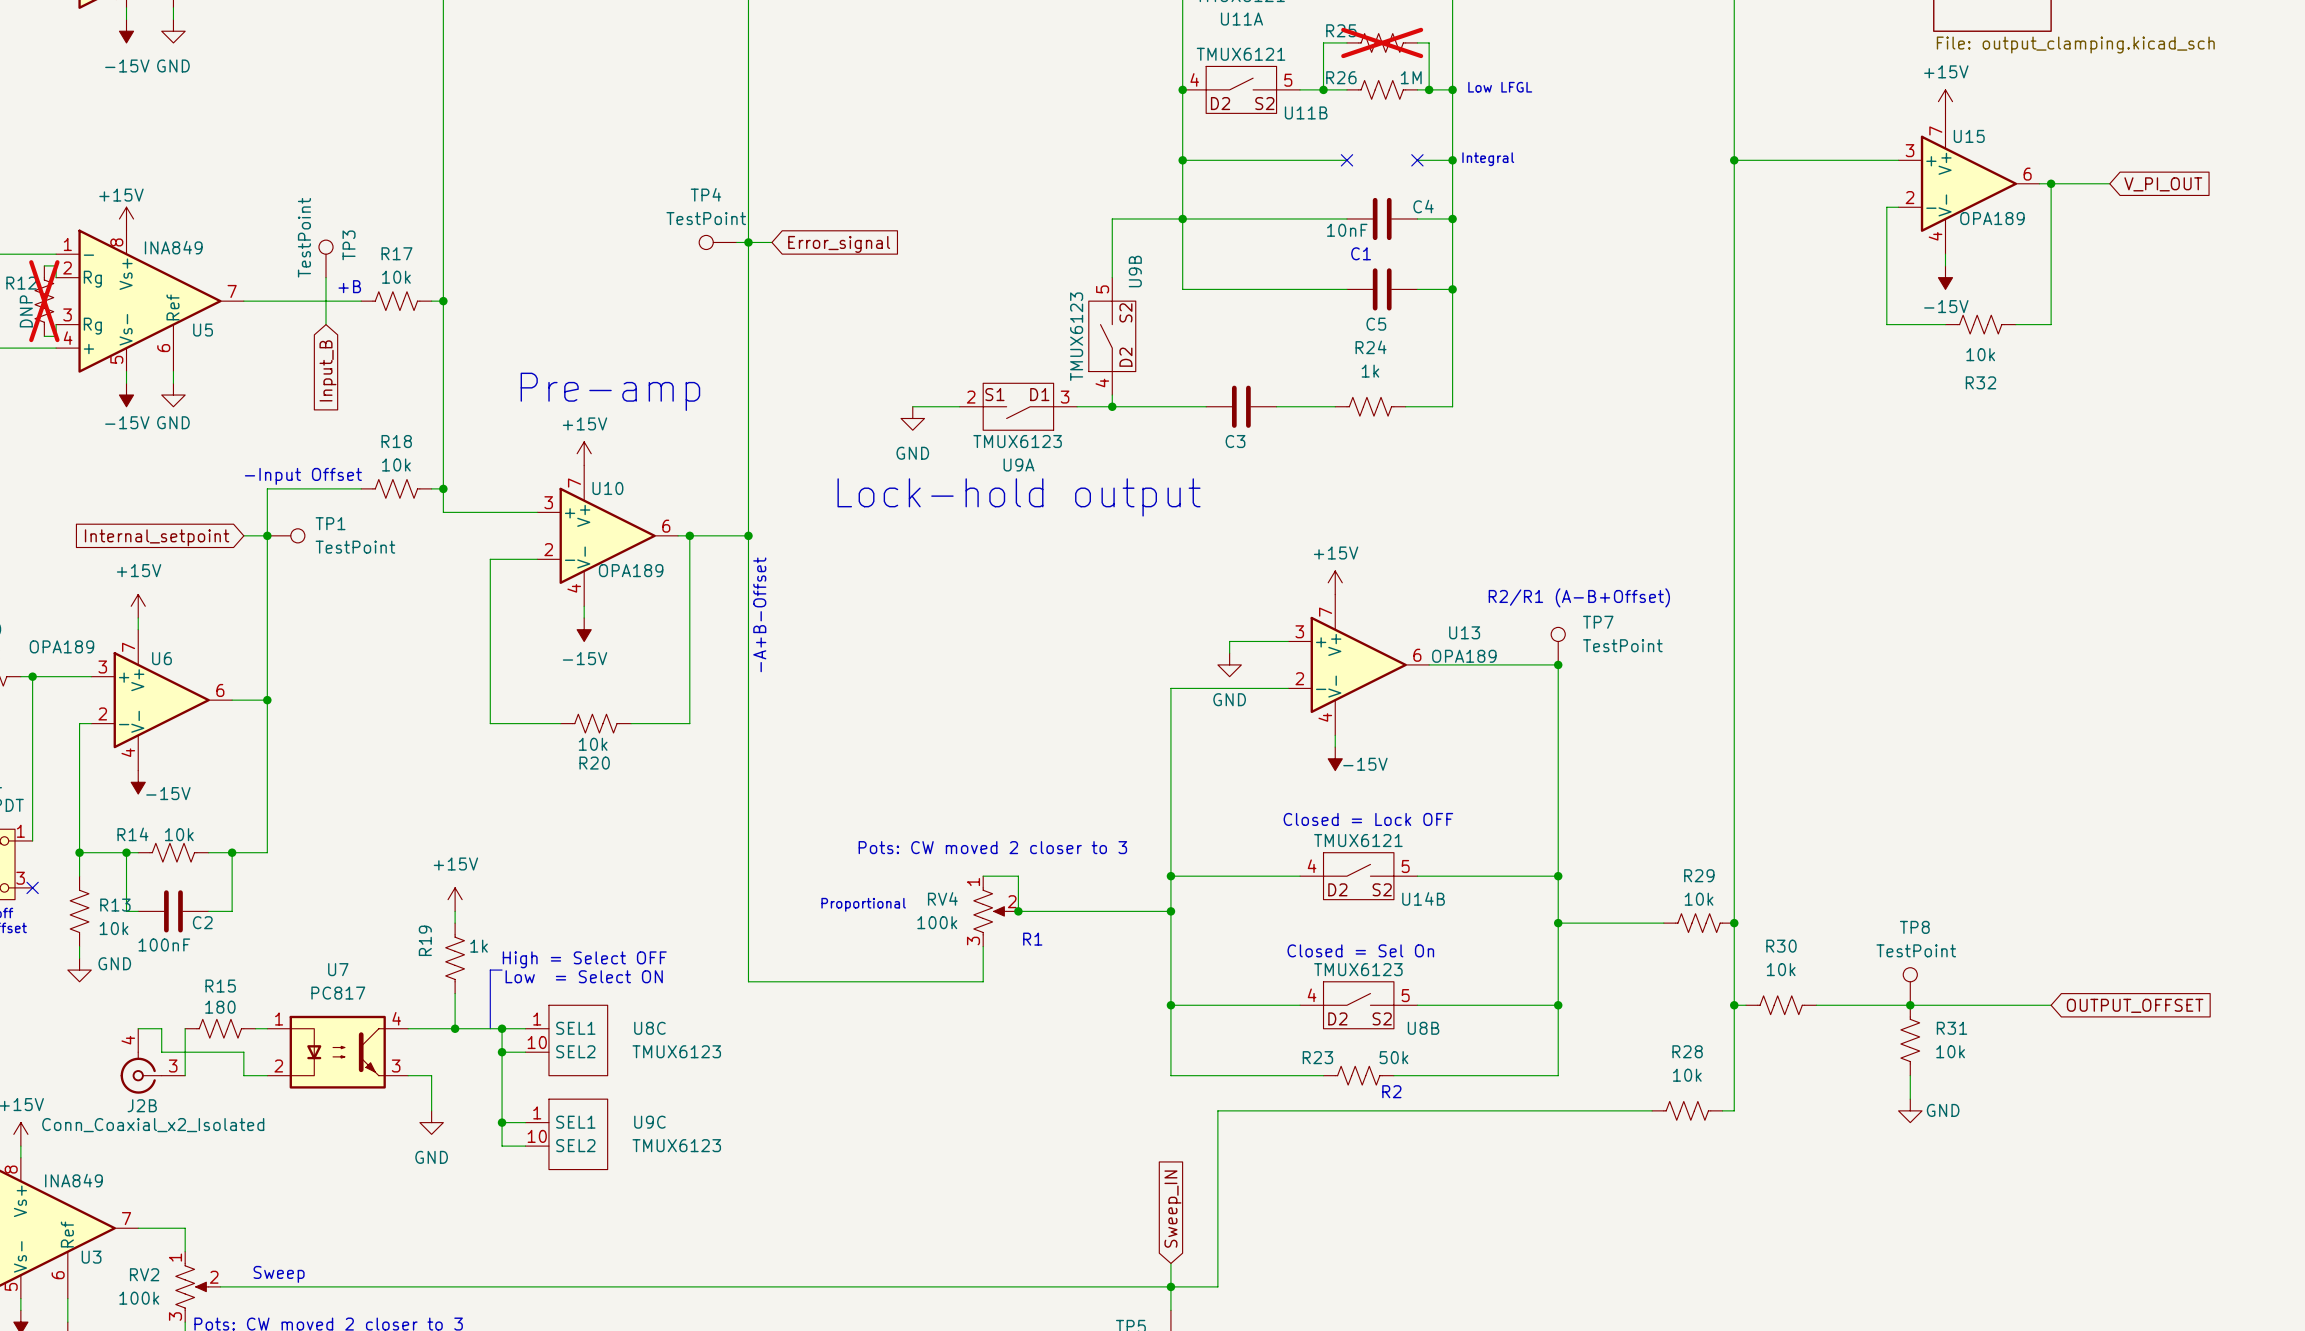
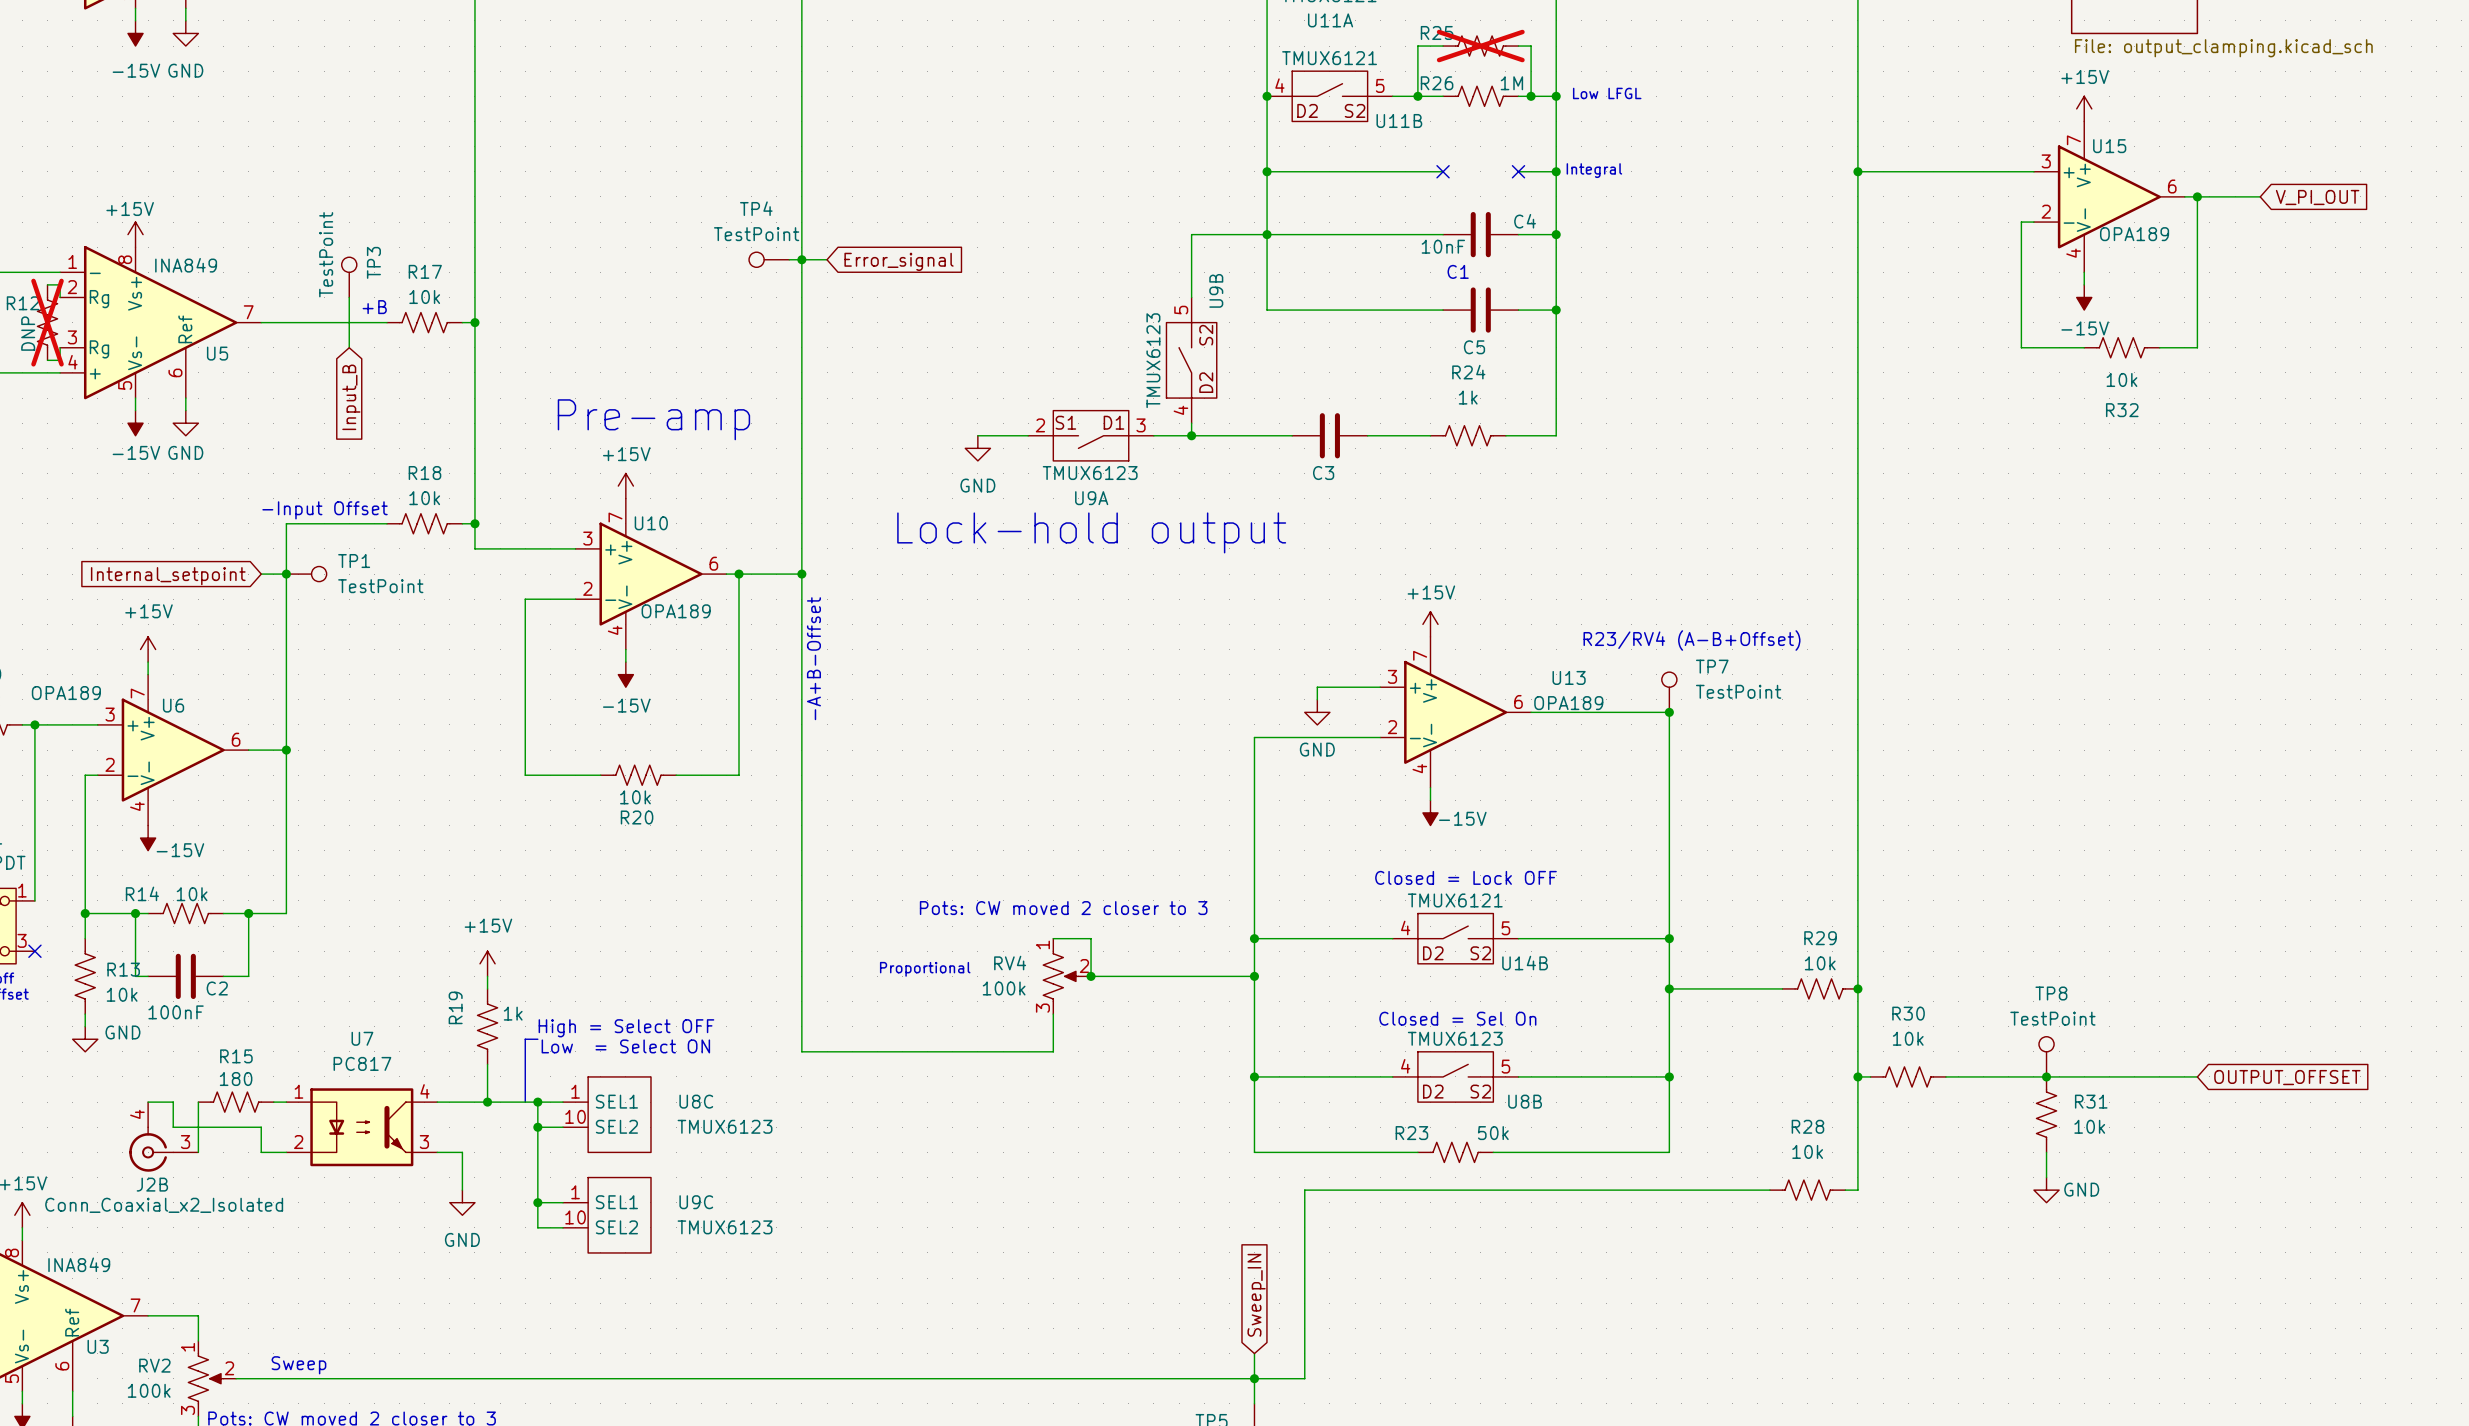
text: R2/R1 (A-B+Offset) (1579, 597) -> R23/RV4 (A-B+Offset) (1691, 640)
text: R1 (1032, 939) -> none
text: R2 (1391, 1091) -> none

